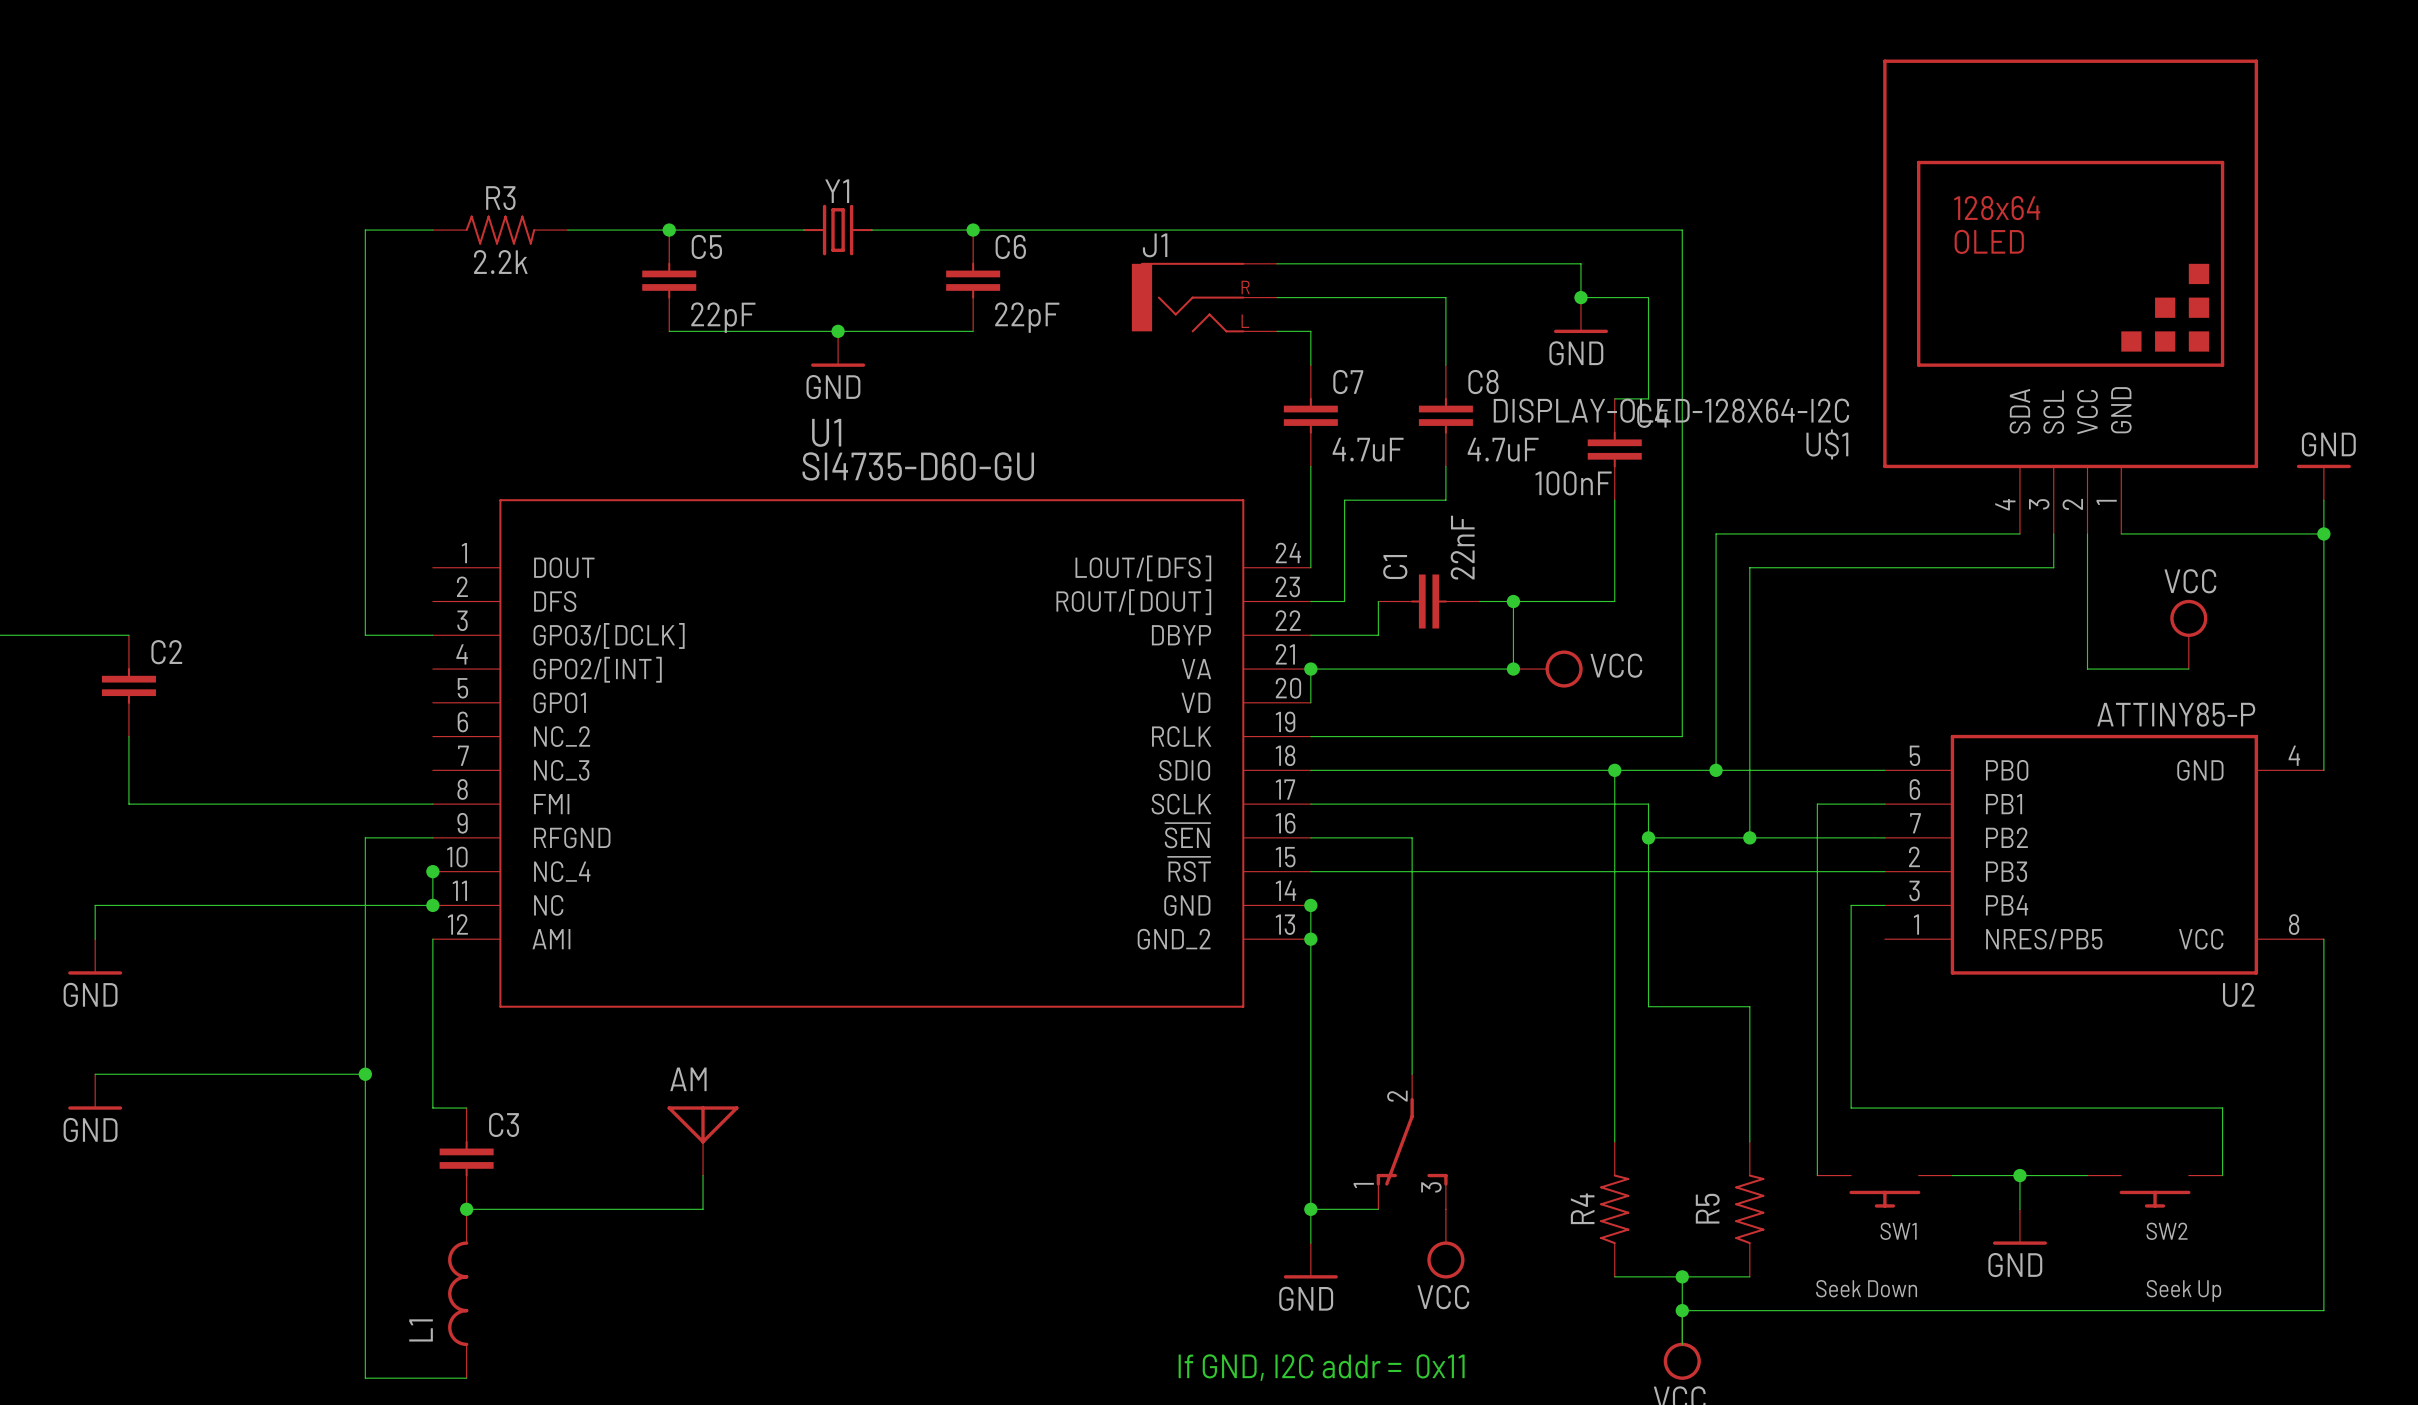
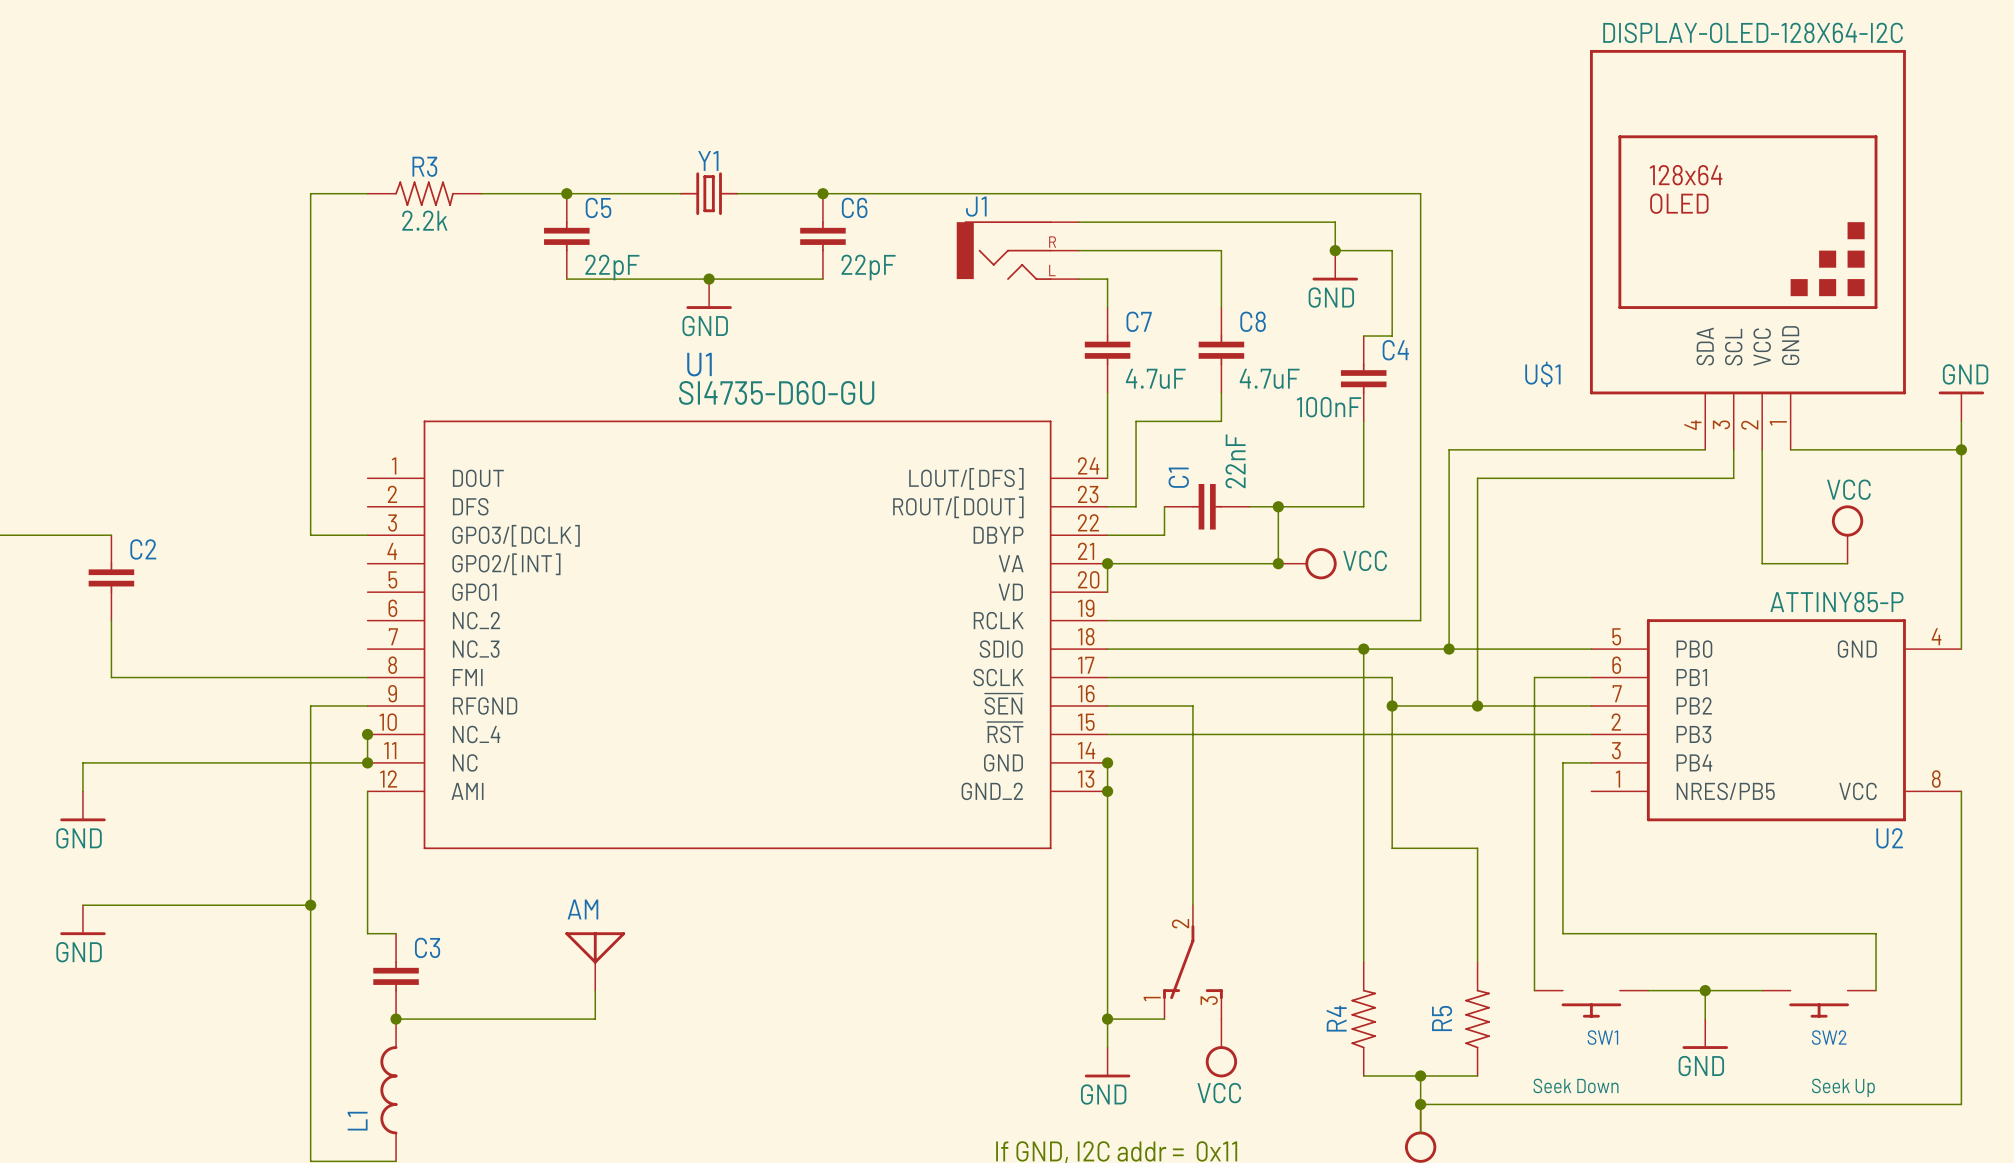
U$1 value position: DISPLAY-OLED-128X64-I2C (1671, 410) -> DISPLAY-OLED-128X64-I2C (1753, 32)

